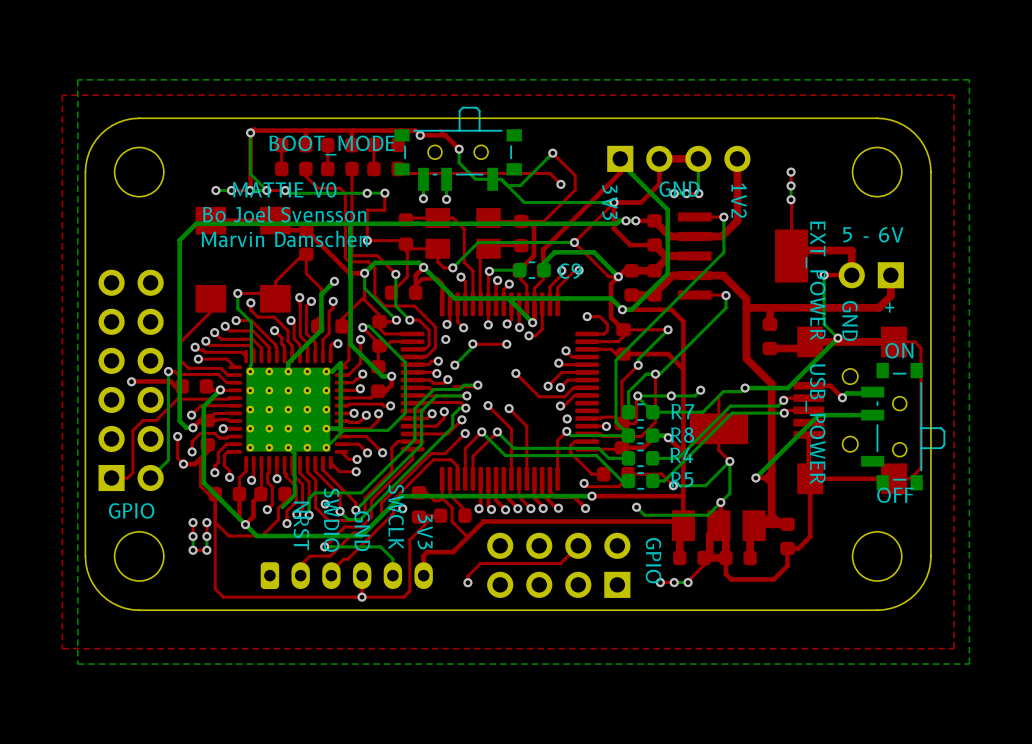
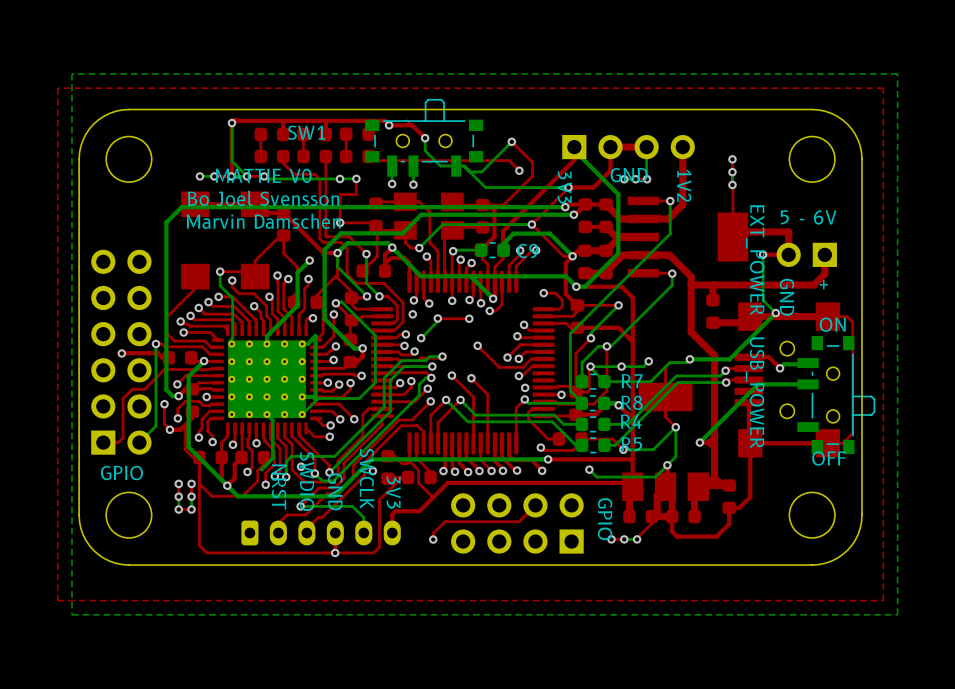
BOOT_MODE name: BOOT_MODE (332, 145) -> SW1 (306, 132)
top track: (613, 202) (613, 228) (632, 245) -> none
via: (626, 220) -> none
bottom track: (635, 220) (619, 220) (616, 223) (610, 223) -> none
via: (635, 220) -> none
top track: none -> (565, 207) (568, 204) (585, 204) (573, 214)
via: none -> (565, 207)
bottom track: (350, 224) (350, 276) -> (573, 214) (421, 214) (402, 233) (340, 233) (324, 249) (324, 255)
via: none -> (573, 214)
part: none -> (585, 215)

